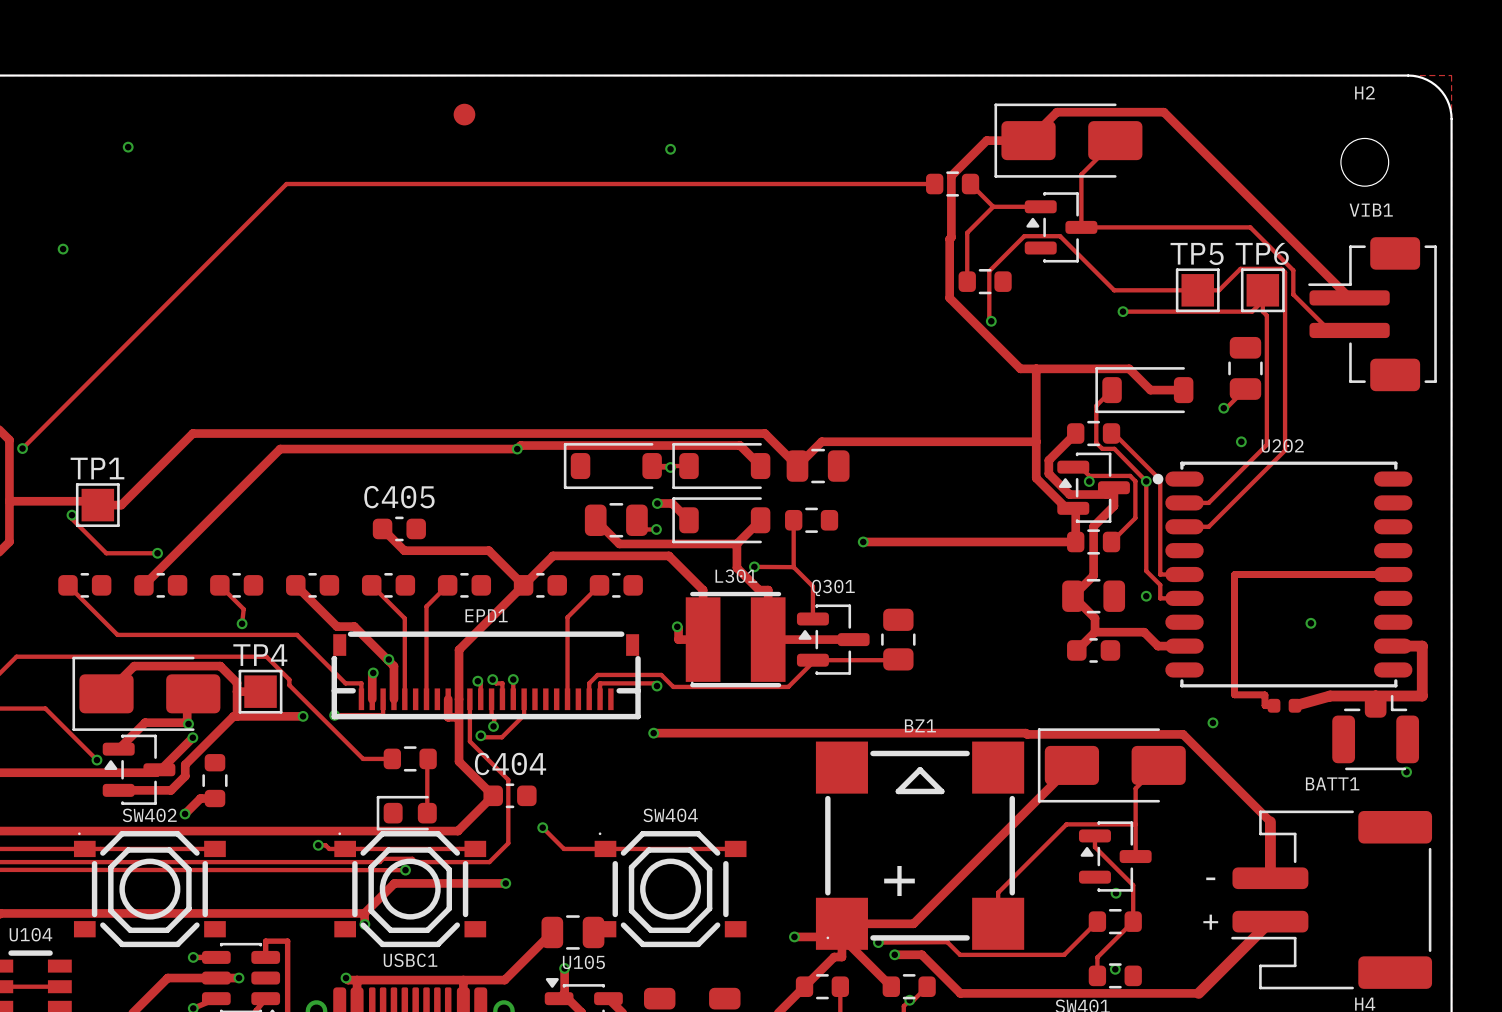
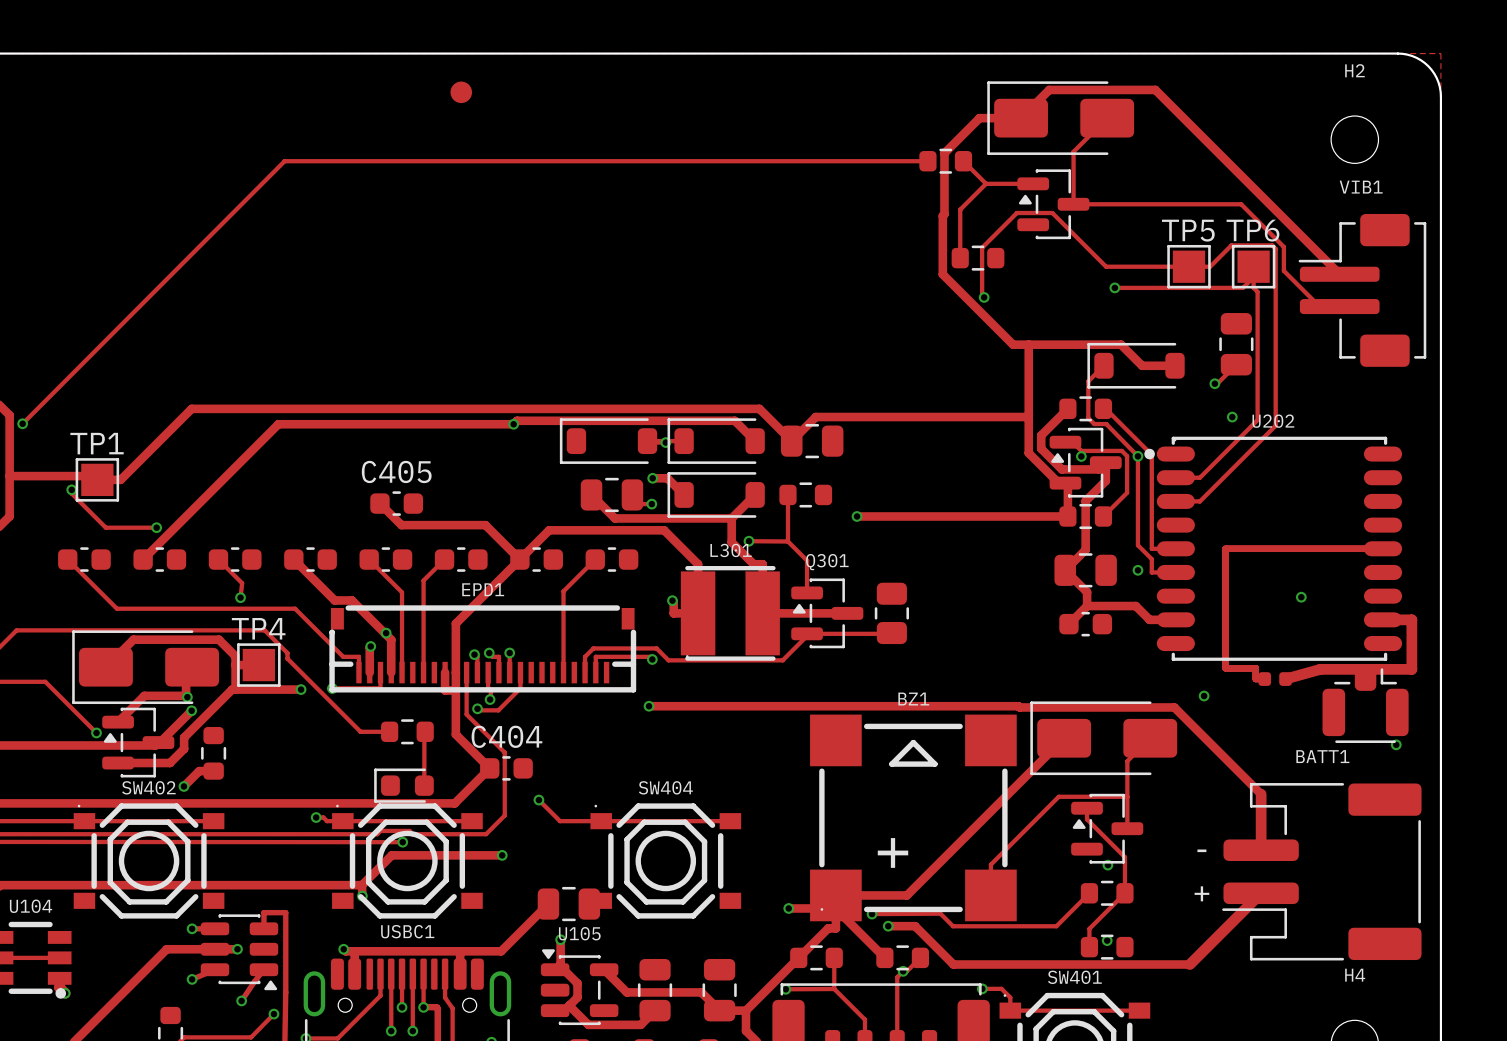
via: (128, 147) -> none
via: (670, 149) -> none
via: (63, 249) -> none

